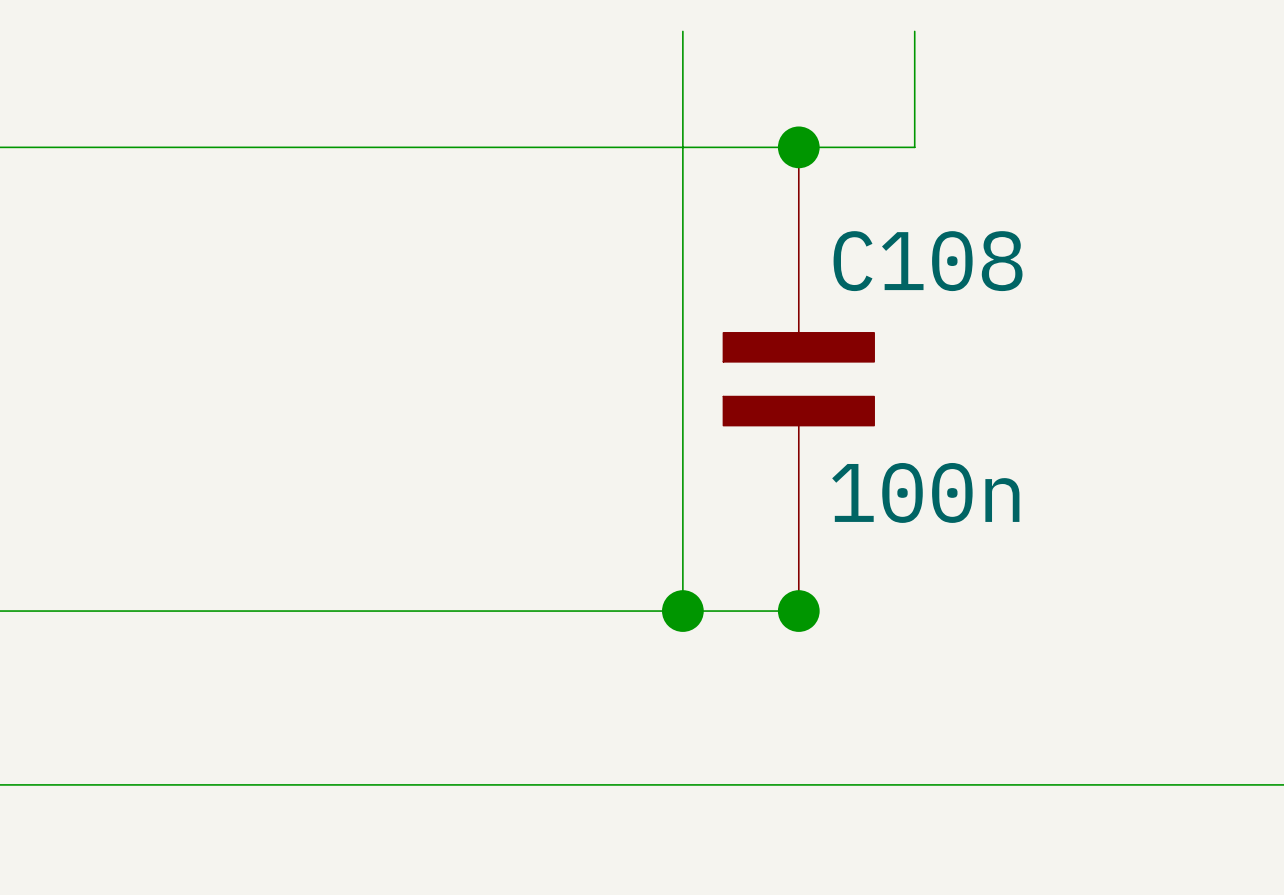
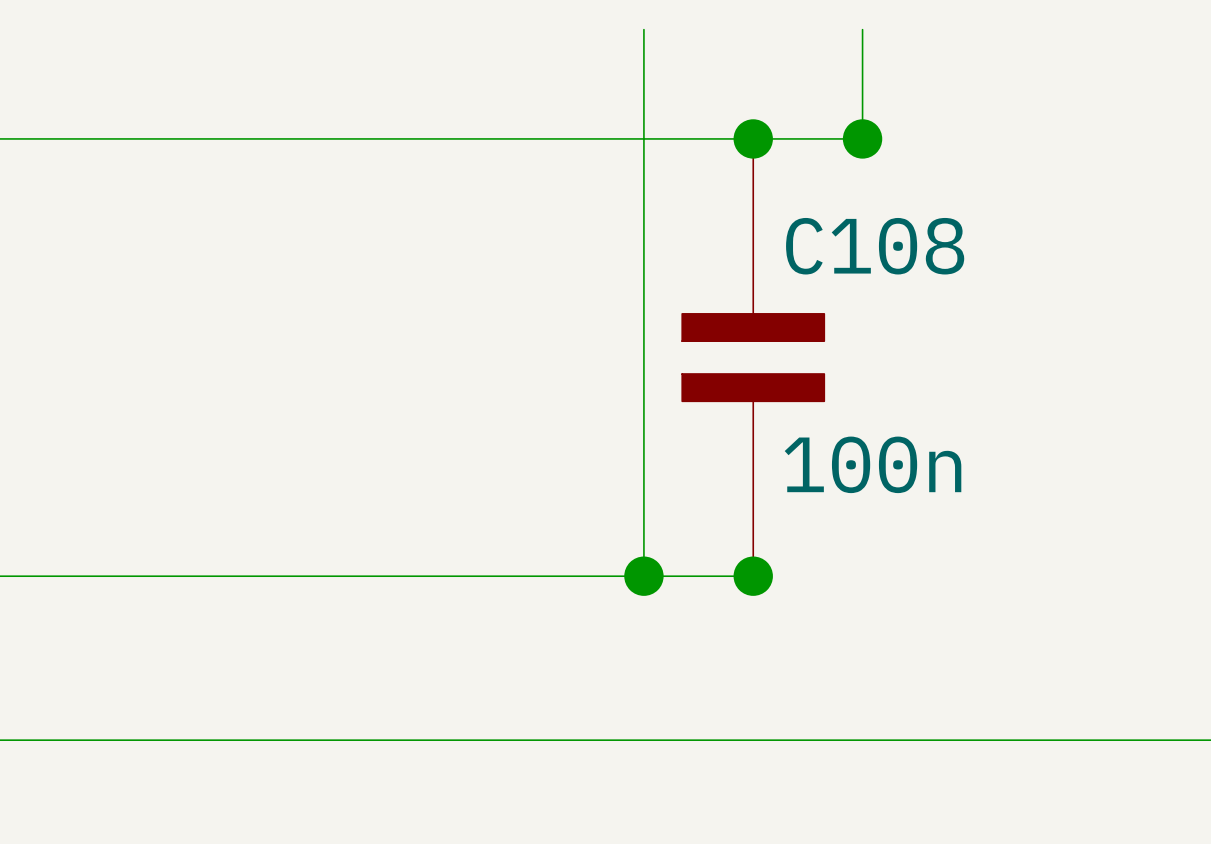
junction: none -> (862, 138)

